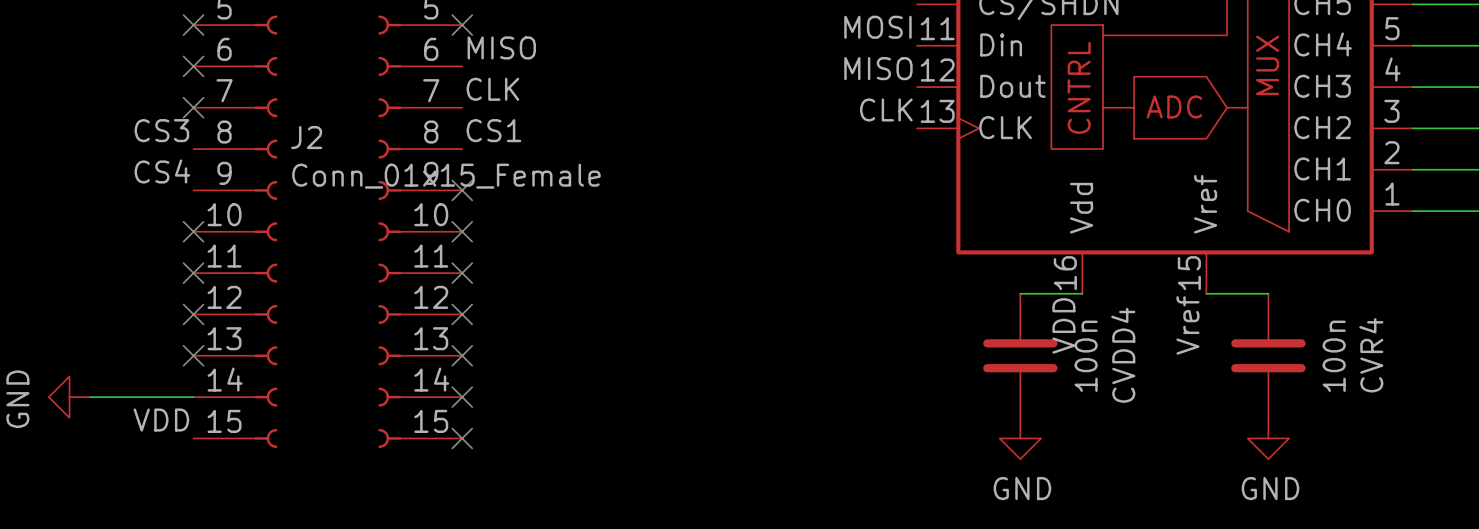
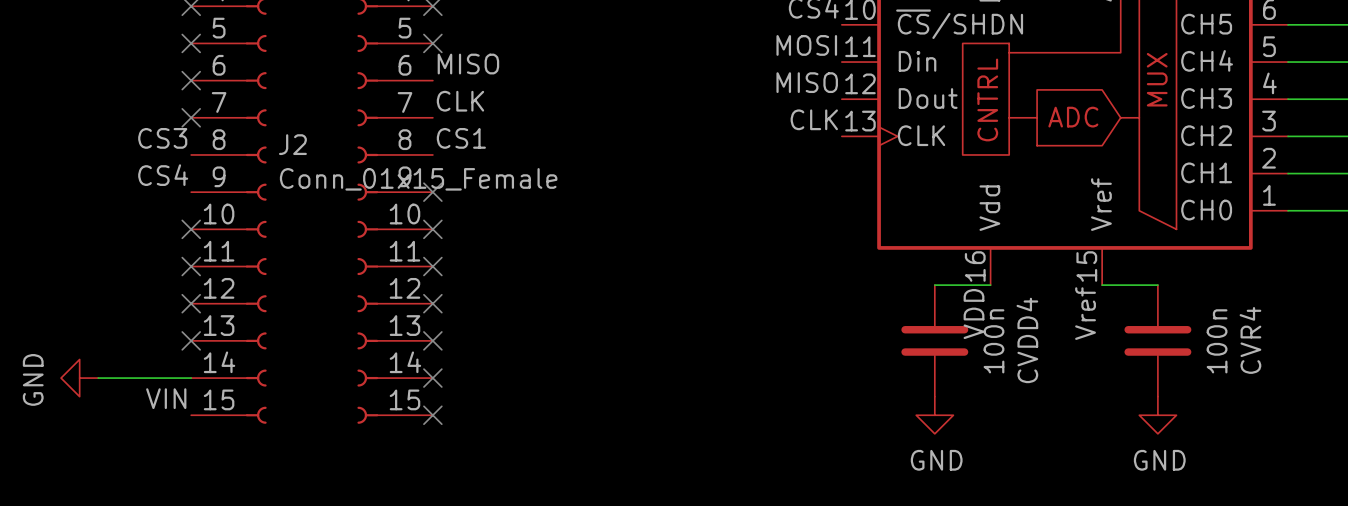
label: VDD (161, 420) -> VIN (166, 398)

